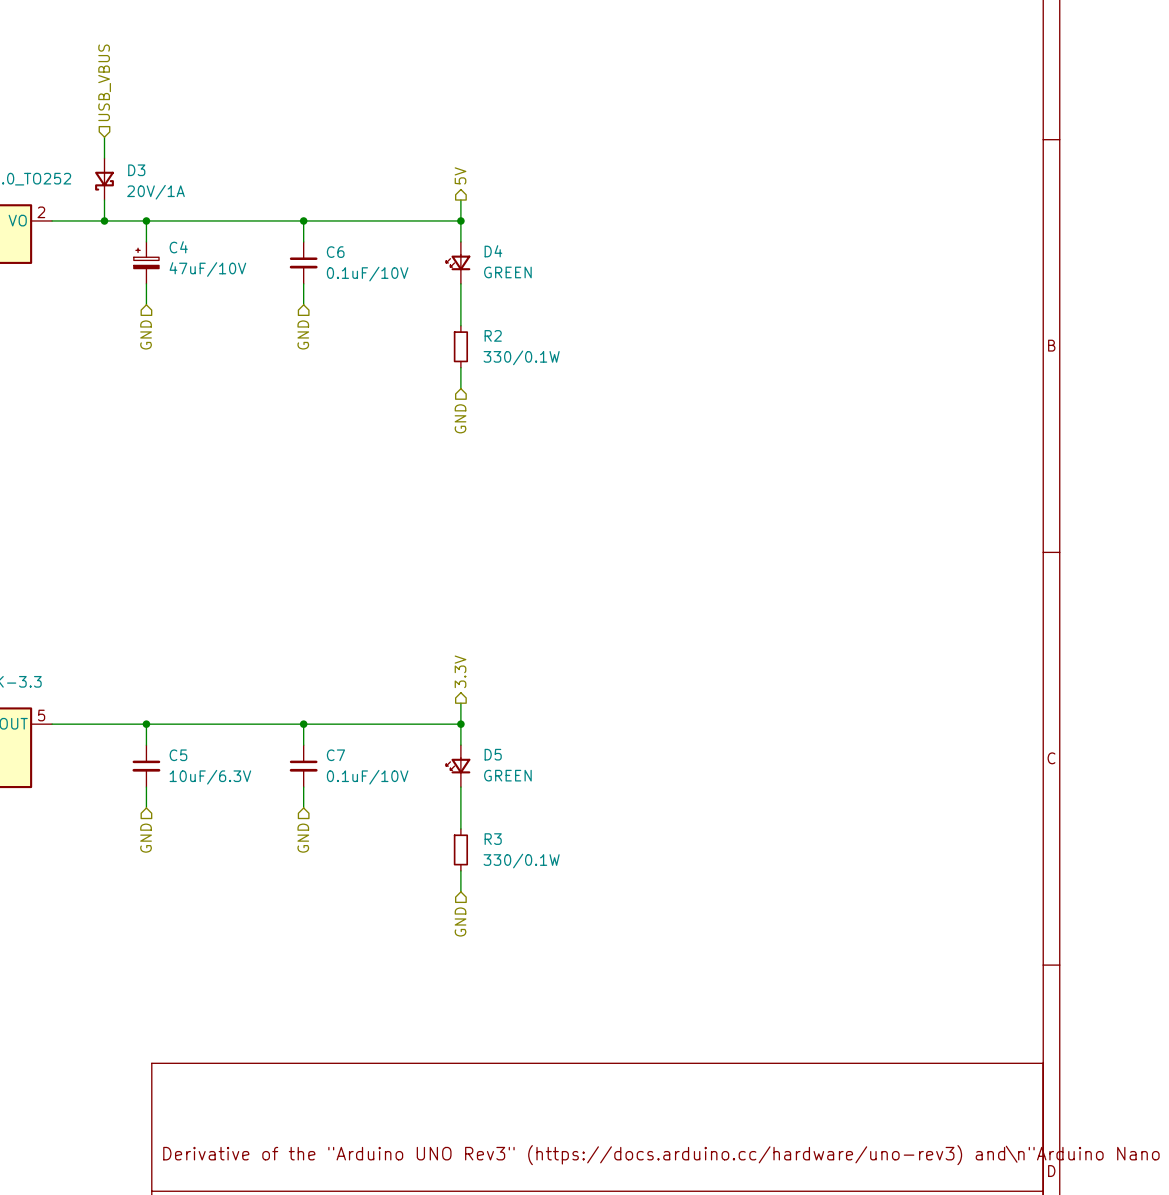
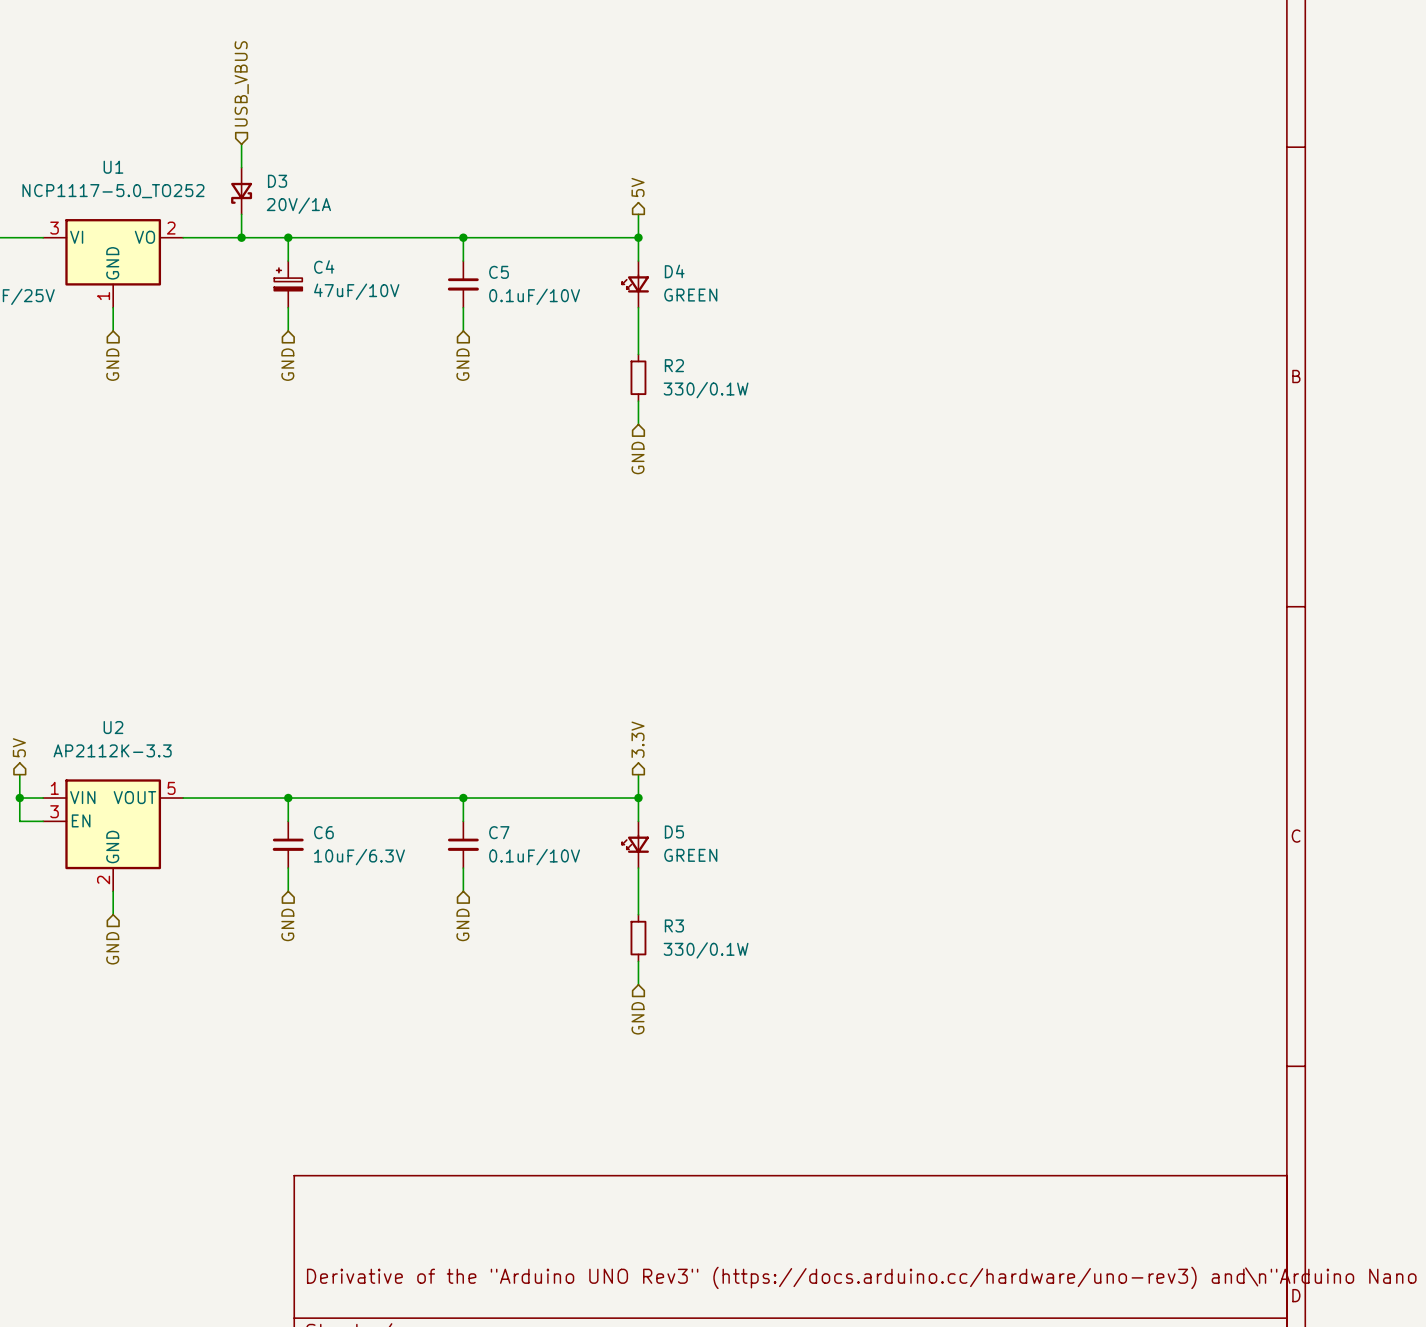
C6 name: C6 (335, 252) -> C5 (499, 272)
C5 name: C5 (178, 755) -> C6 (323, 832)

